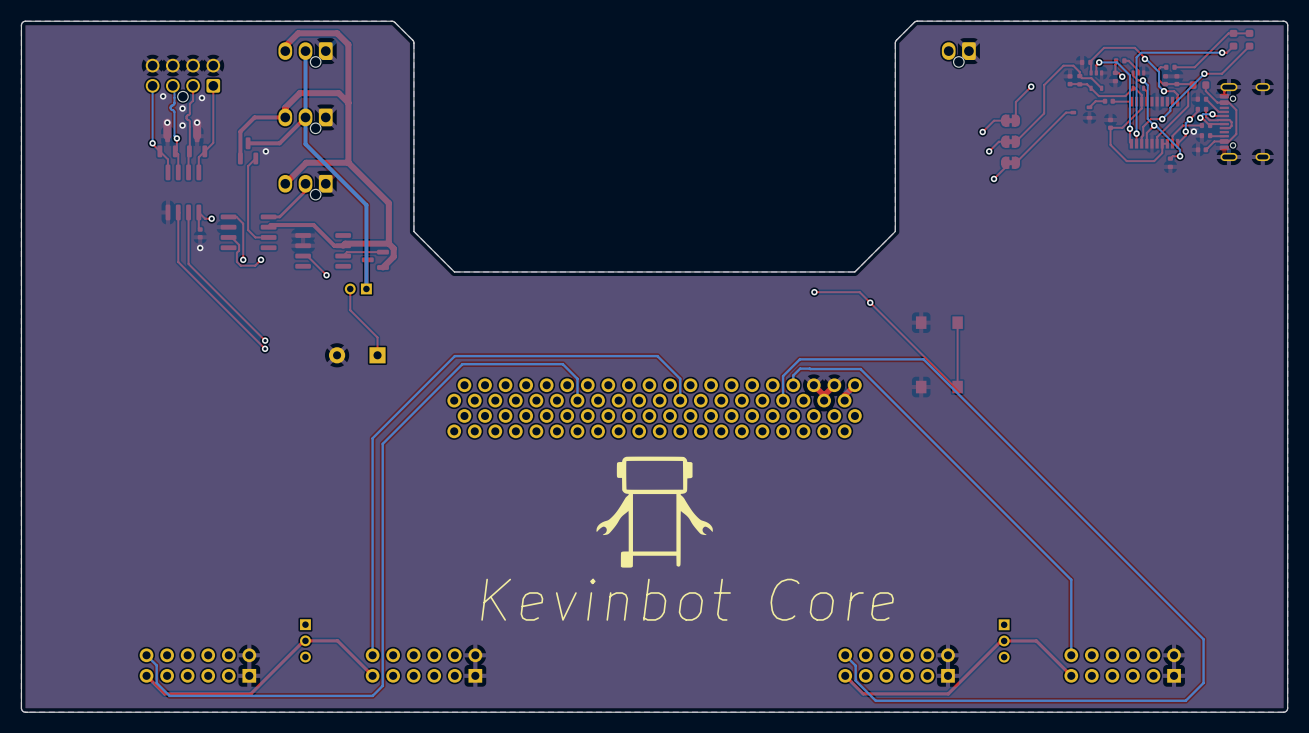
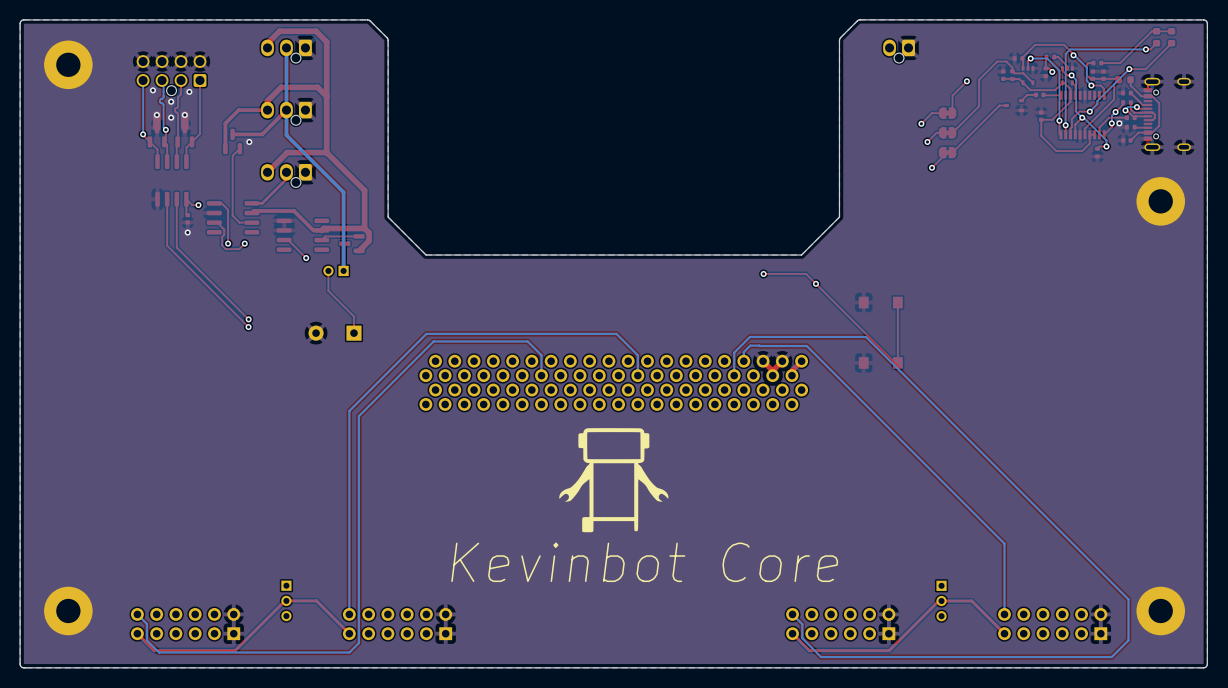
part: none -> (68, 64)
part: none -> (1160, 201)
part: none -> (68, 611)
part: none -> (1160, 611)

